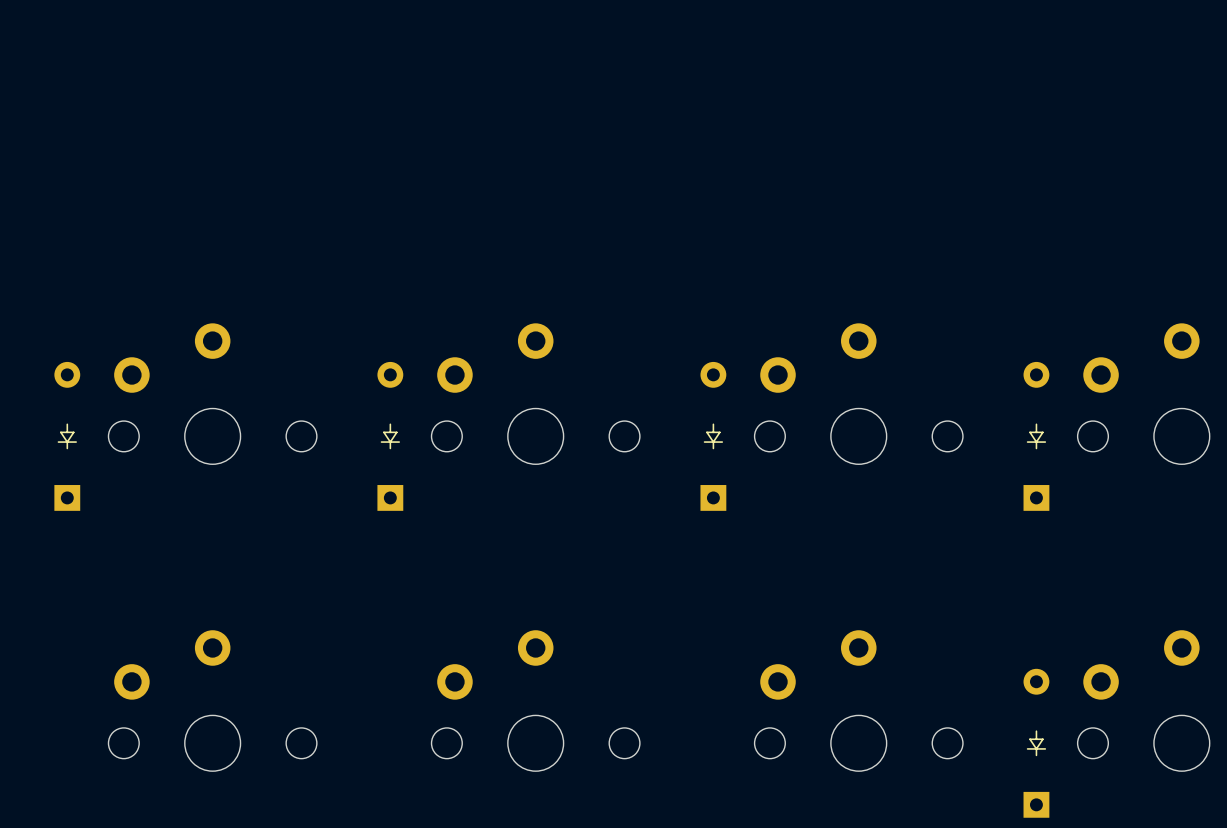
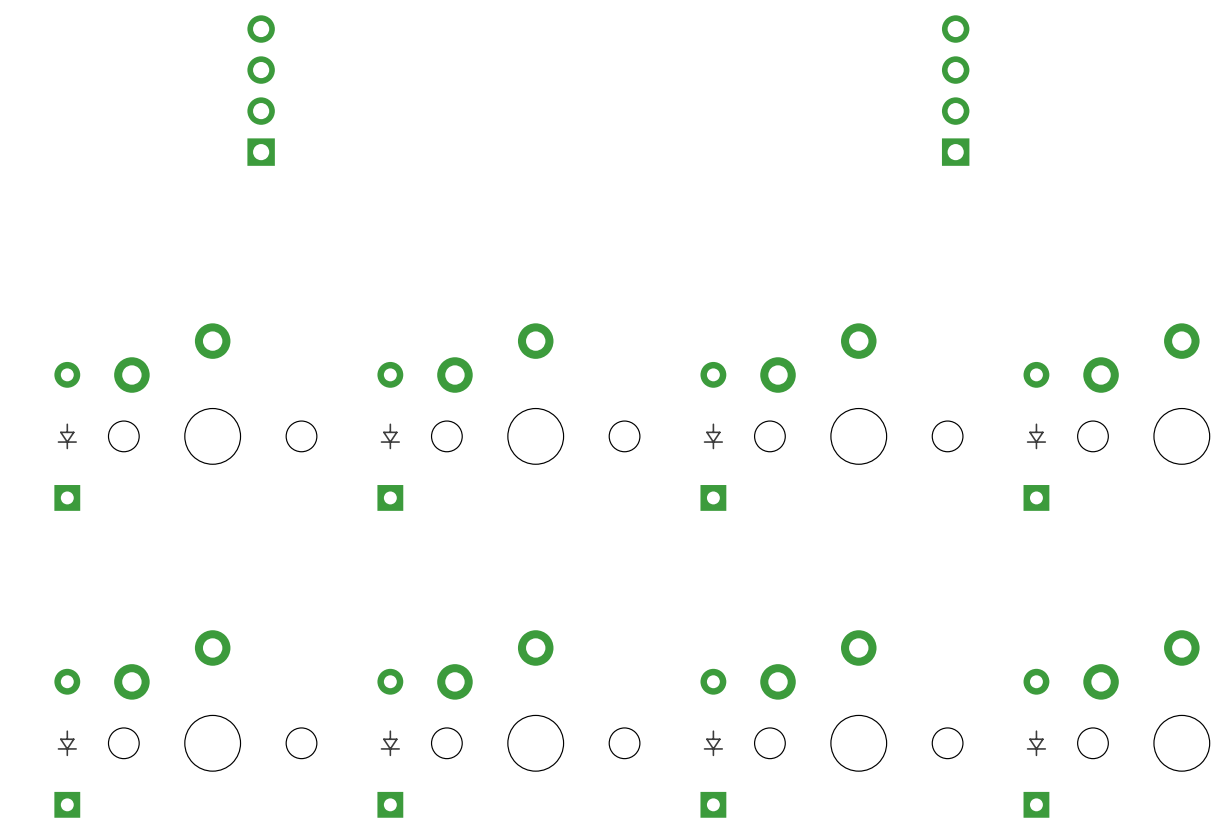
part: none -> (261, 90)
part: none -> (955, 90)
part: none -> (67, 743)
part: none -> (390, 743)
part: none -> (713, 743)

